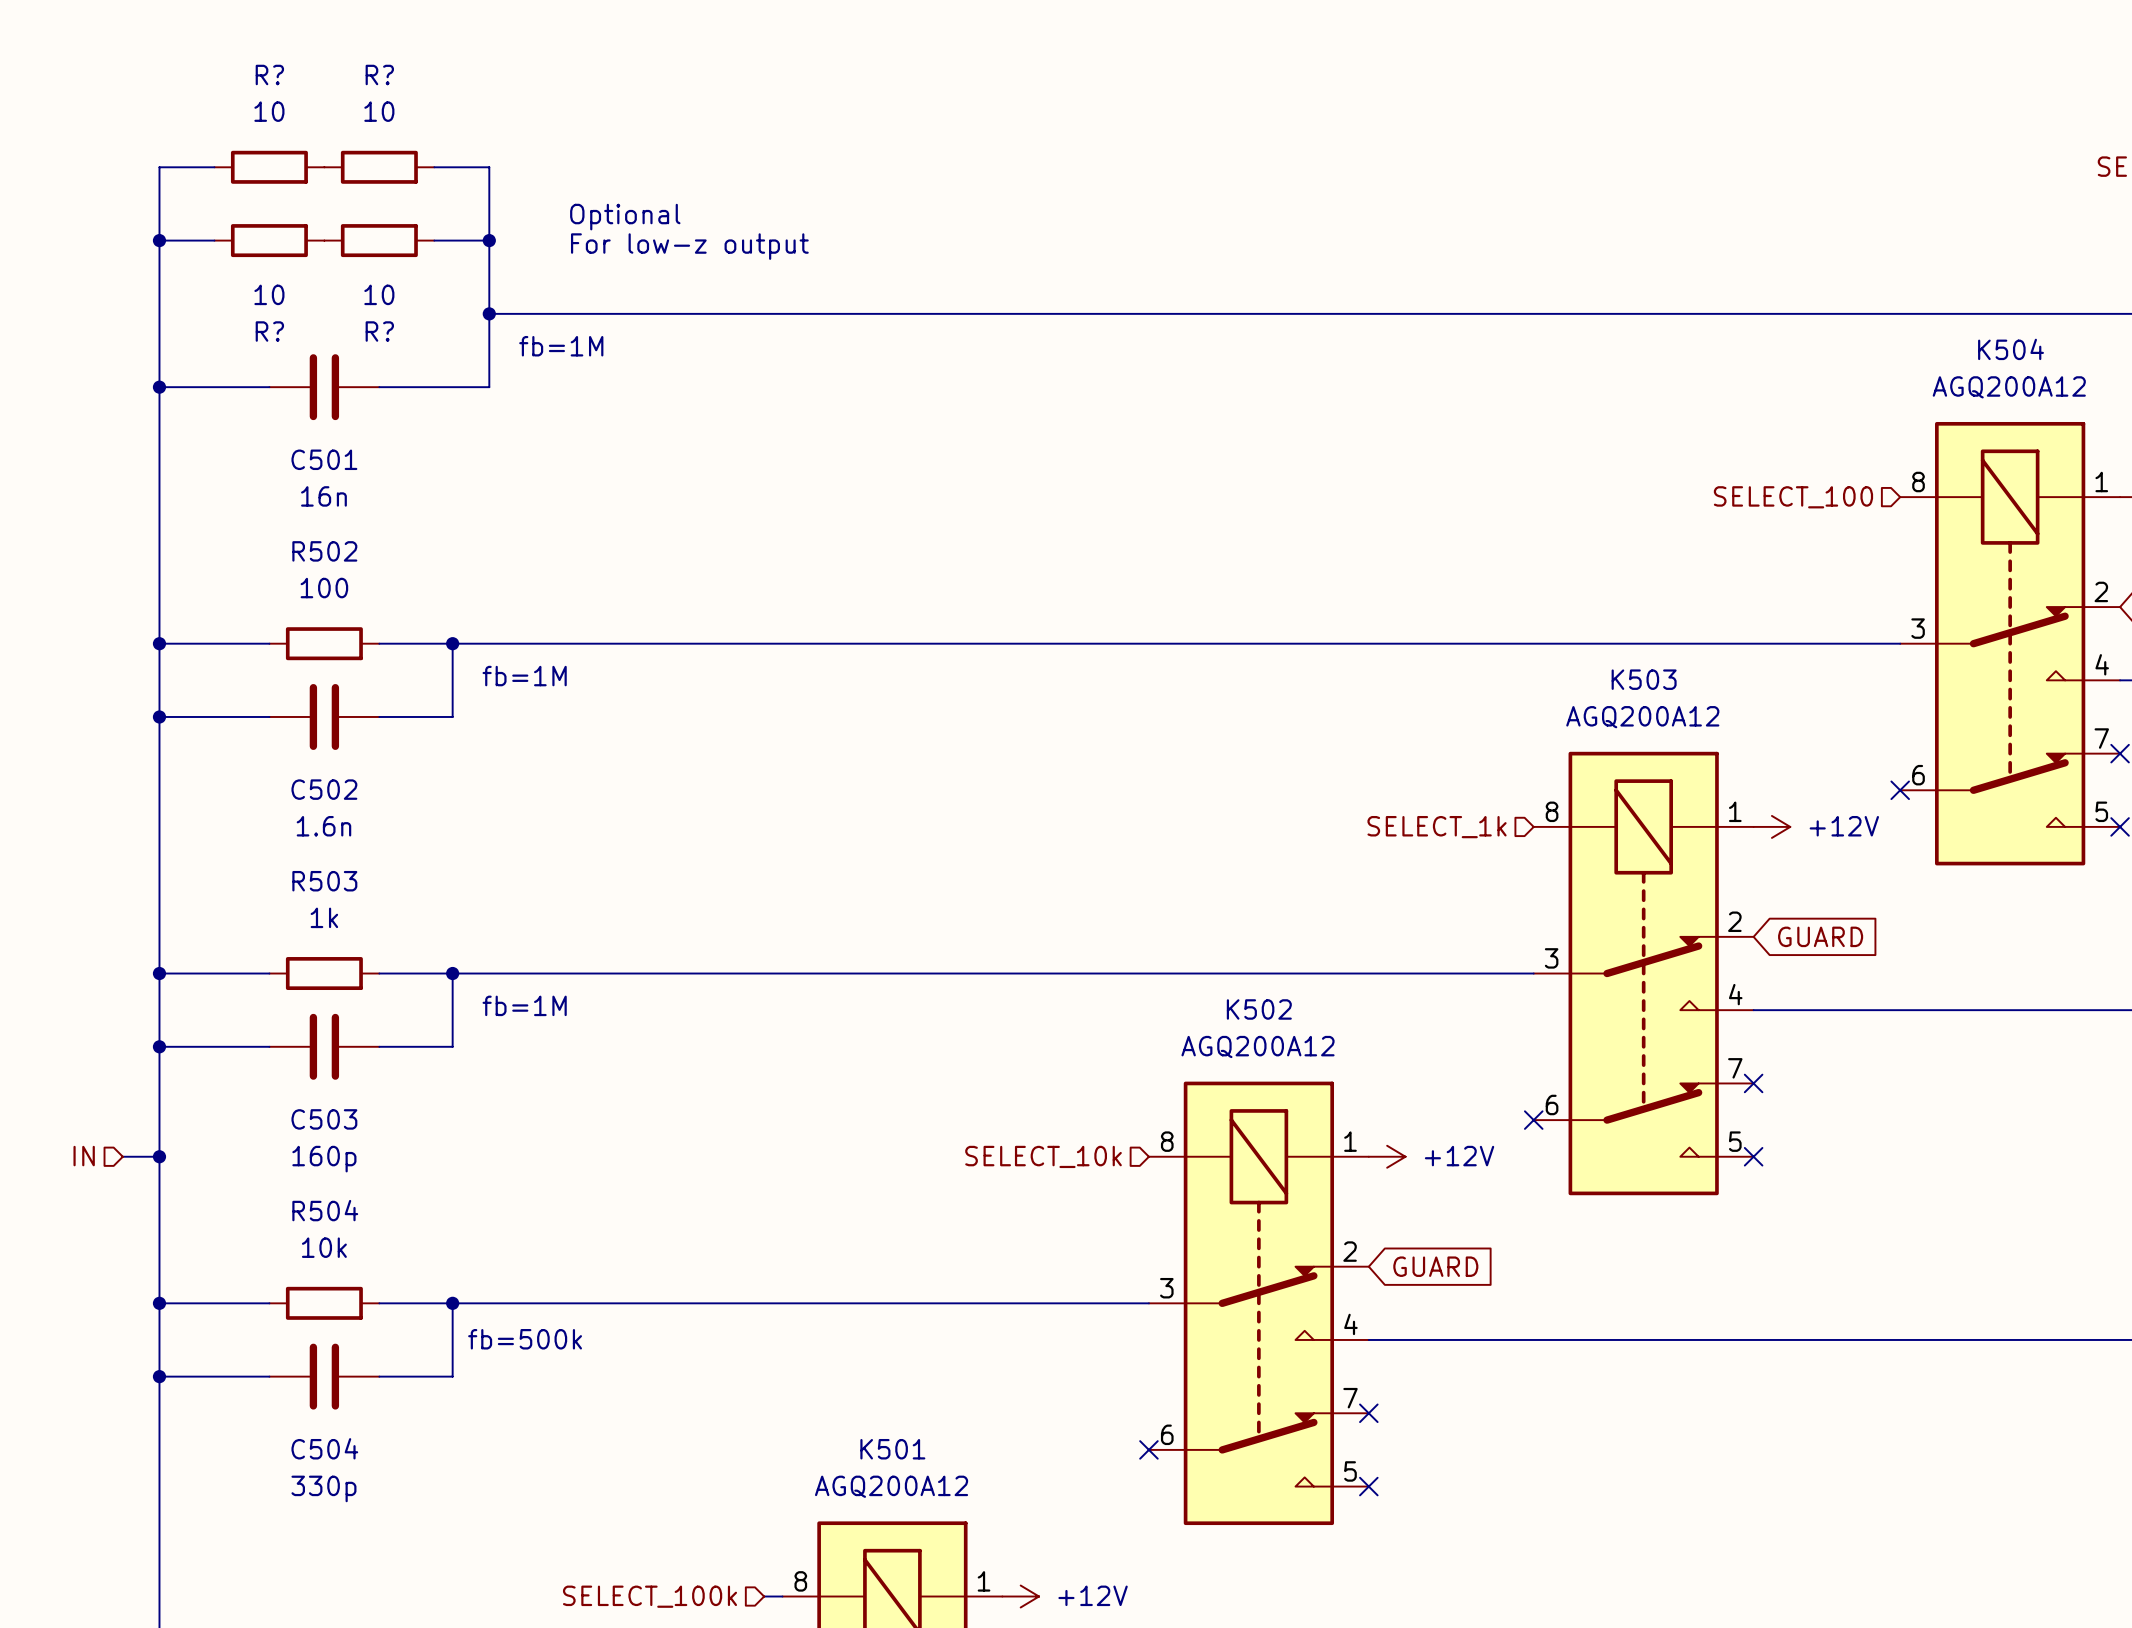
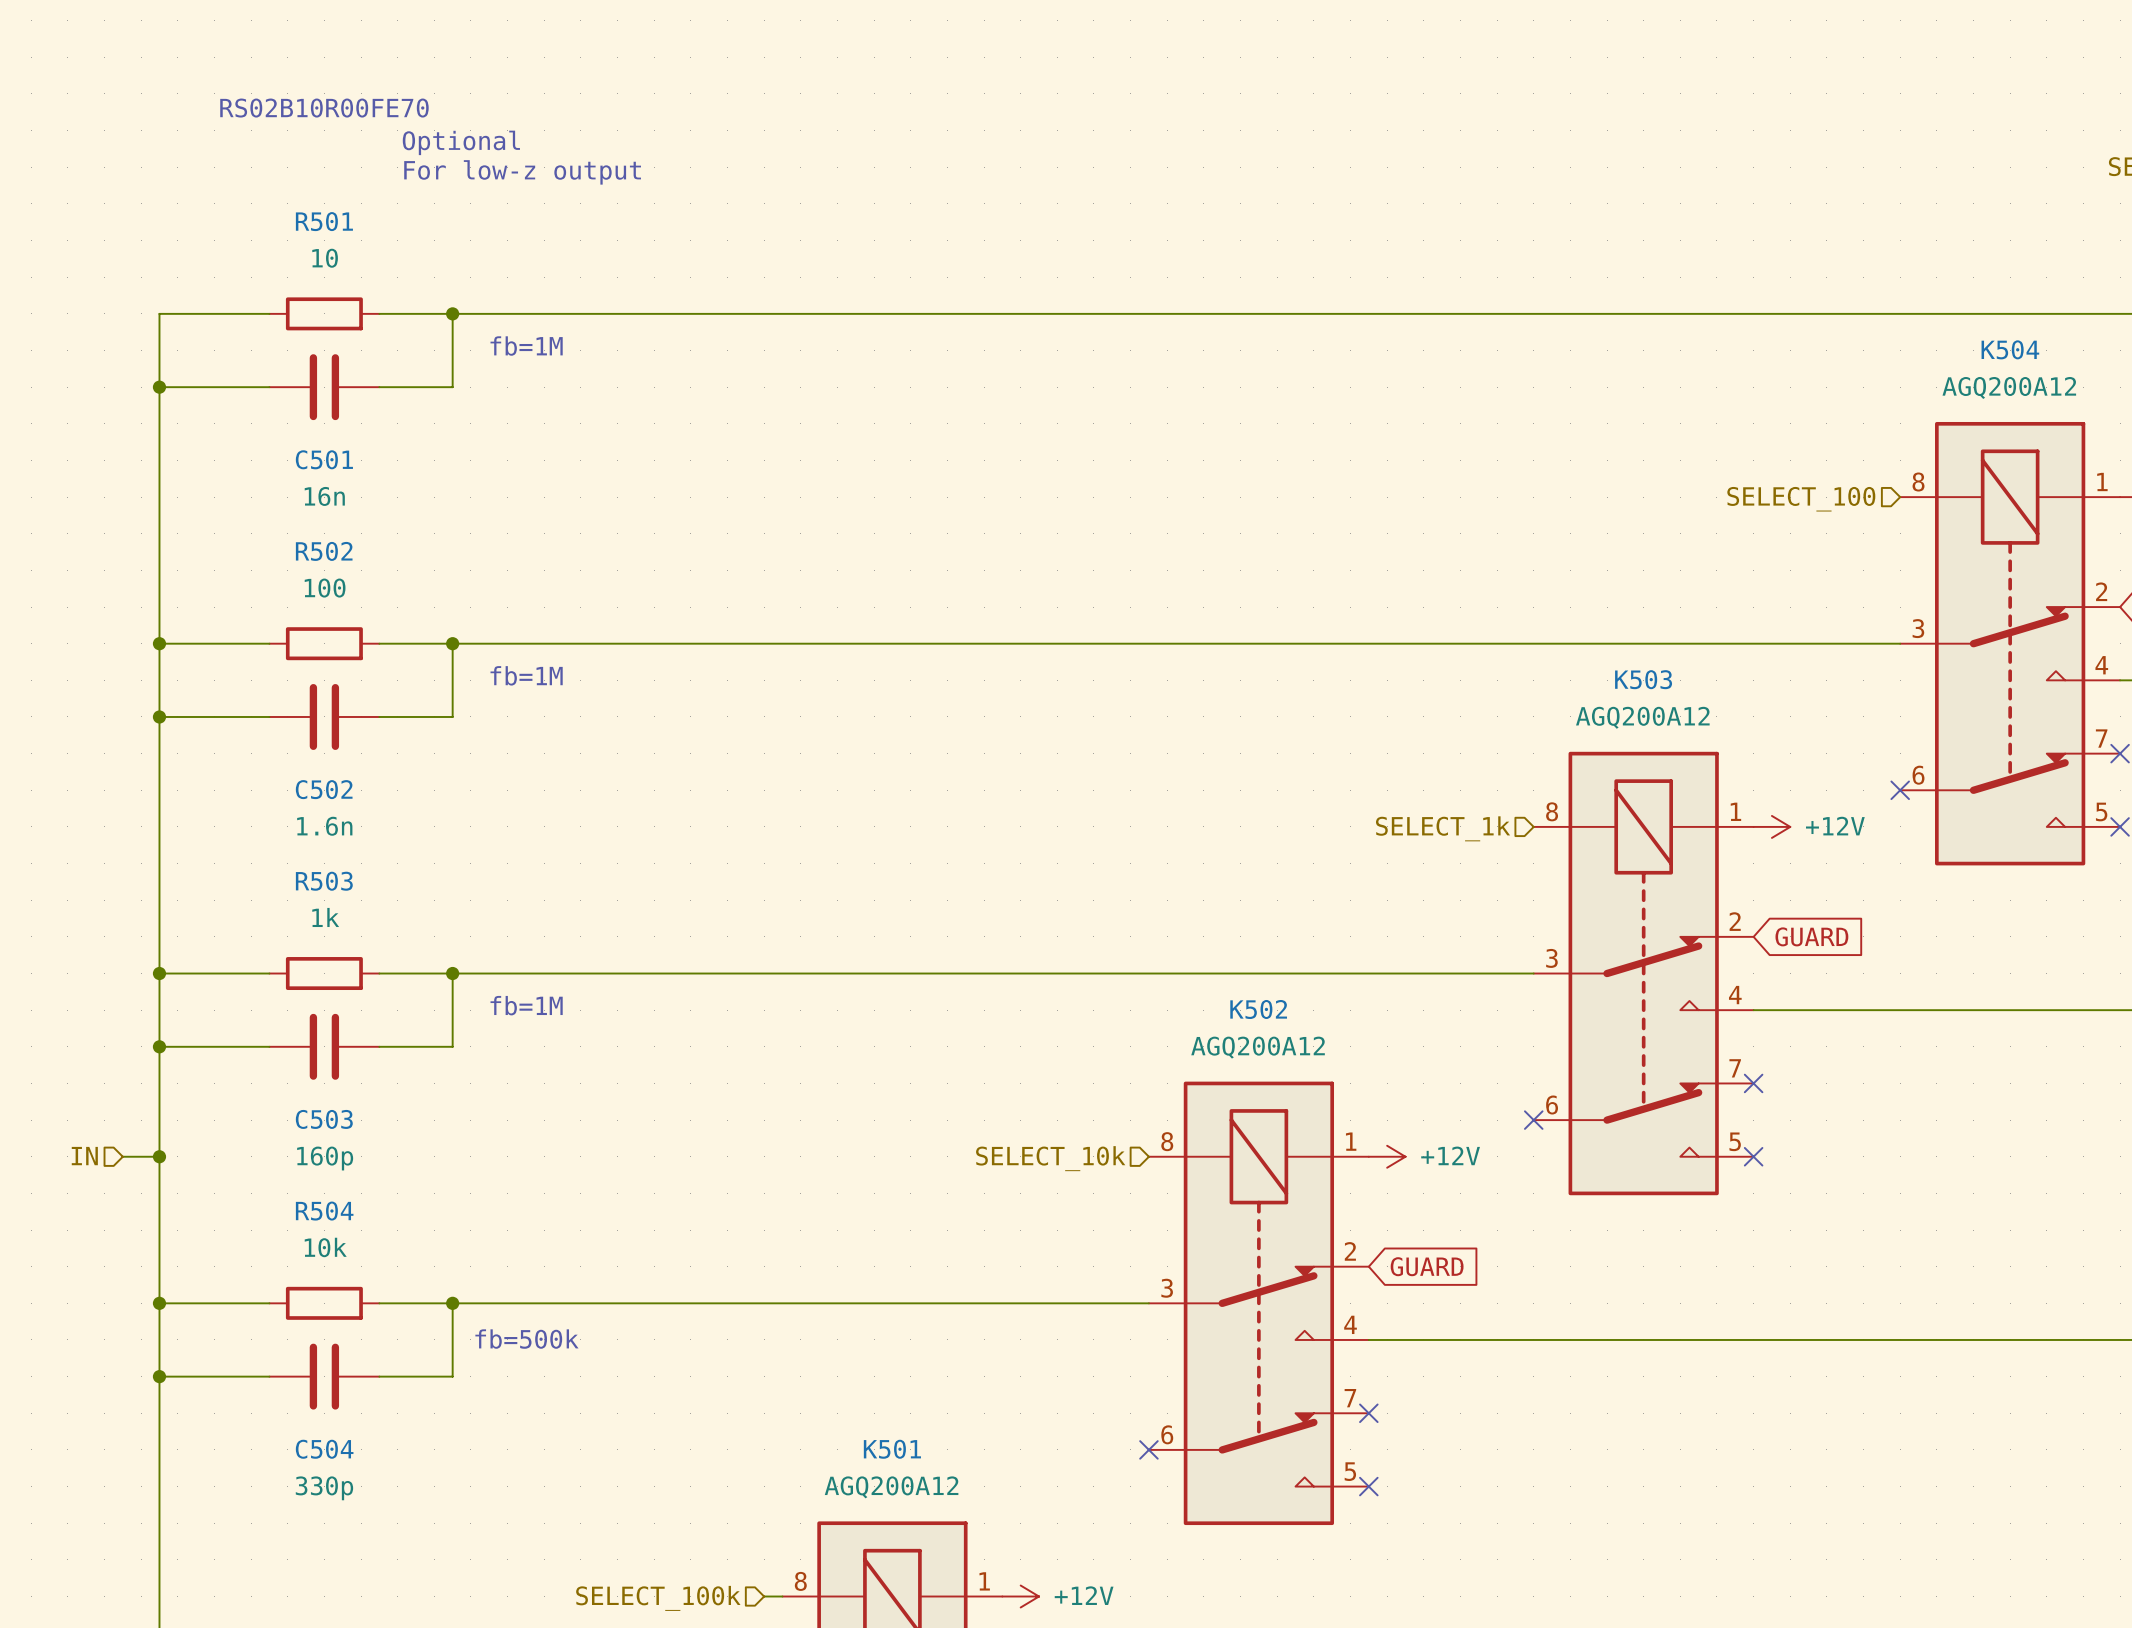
text: none -> RS02B10R00FE70 (324, 108)
wire: (214, 167) (159, 167) (159, 313) -> (269, 313) (159, 313)
R?: 10 (269, 167) -> none
R?: 10 (379, 167) -> none
wire: (434, 167) (489, 167) (489, 387) (452, 387) -> (452, 313) (452, 387)
text position: Optional (625, 217) -> Optional (461, 142)
wire: (159, 240) (214, 240) -> none
junction: (159, 240) -> none
R?: 10 (269, 240) -> none
R?: 10 (379, 240) -> none
wire: (434, 240) (489, 240) -> none
junction: (489, 240) -> none
text position: For low-z output (689, 246) -> For low-z output (522, 172)
R501: none -> 10 (324, 313)
wire: none -> (379, 313) (489, 313)
junction position: (489, 313) -> (452, 313)
text position: fb=1M (561, 346) -> fb=1M (526, 346)

